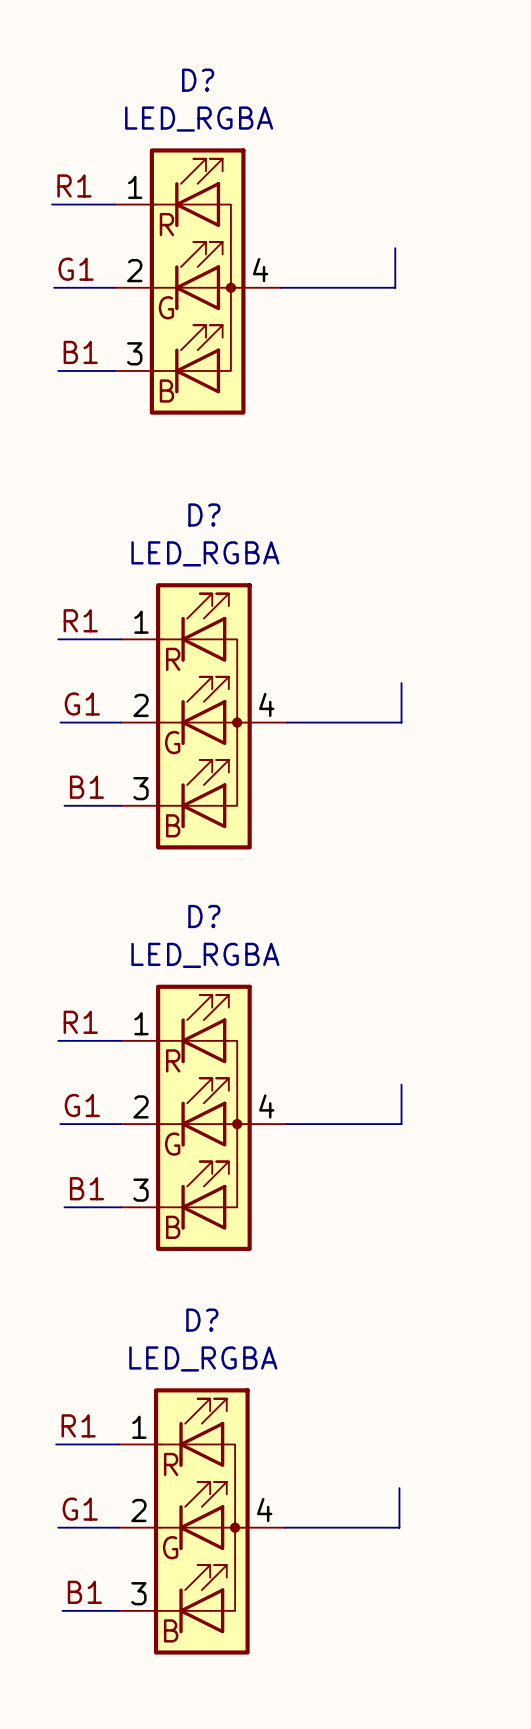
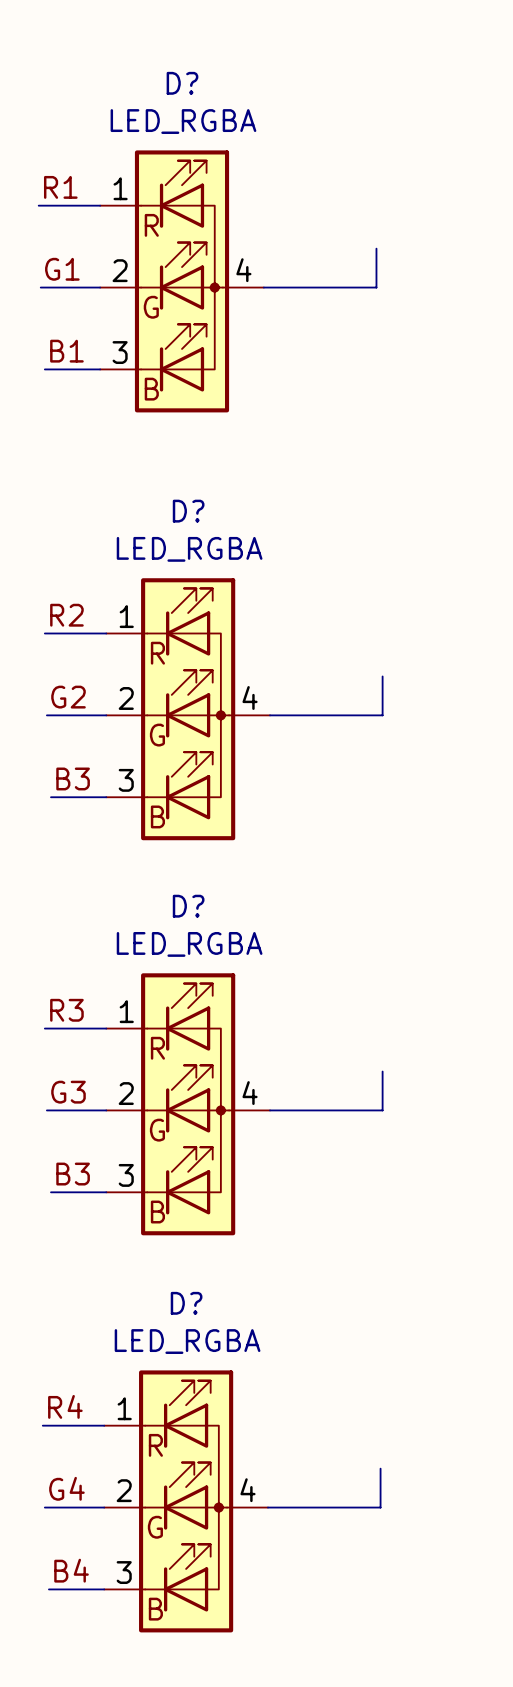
label: R1 (80, 620) -> R2 (66, 615)
label: G1 (82, 704) -> G2 (68, 697)
label: B1 (86, 787) -> B3 (73, 778)
label: R1 (80, 1022) -> R3 (66, 1010)
label: G1 (82, 1105) -> G3 (68, 1092)
label: B1 (86, 1188) -> B3 (73, 1174)
label: R1 (78, 1425) -> R4 (65, 1406)
label: G1 (80, 1509) -> G4 (66, 1488)
label: B1 (84, 1592) -> B4 (71, 1570)

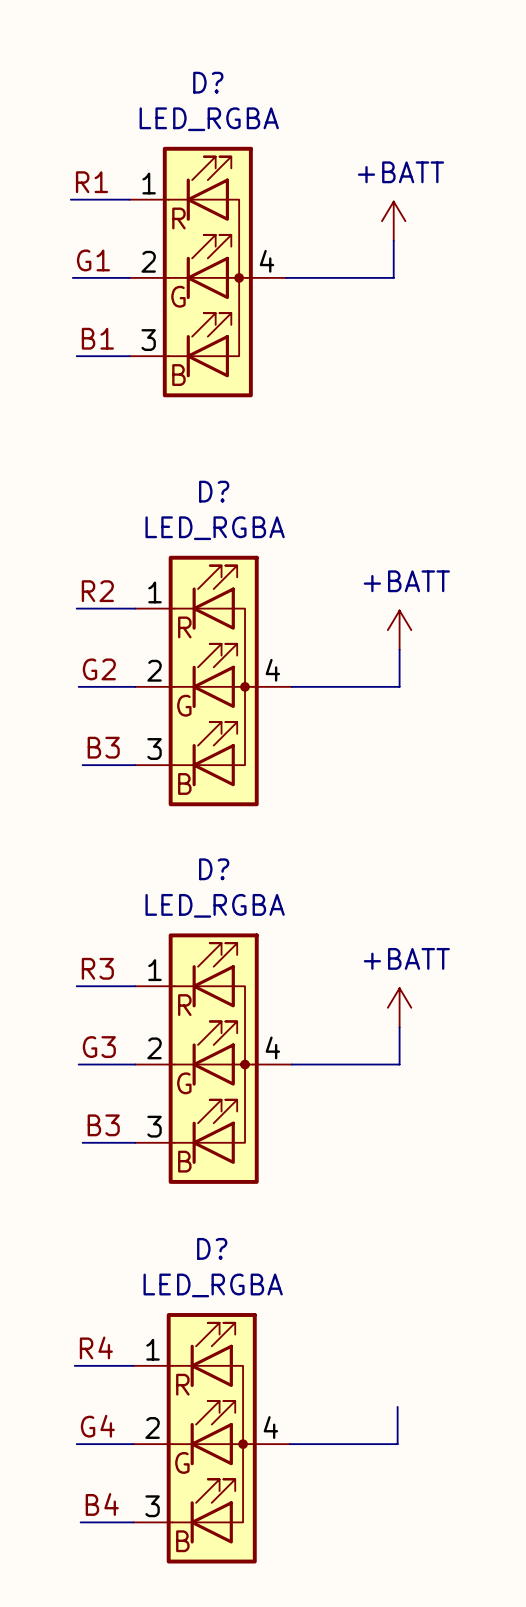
power symbol: none -> +BATT (393, 221)
power symbol: none -> +BATT (399, 630)
power symbol: none -> +BATT (399, 1007)

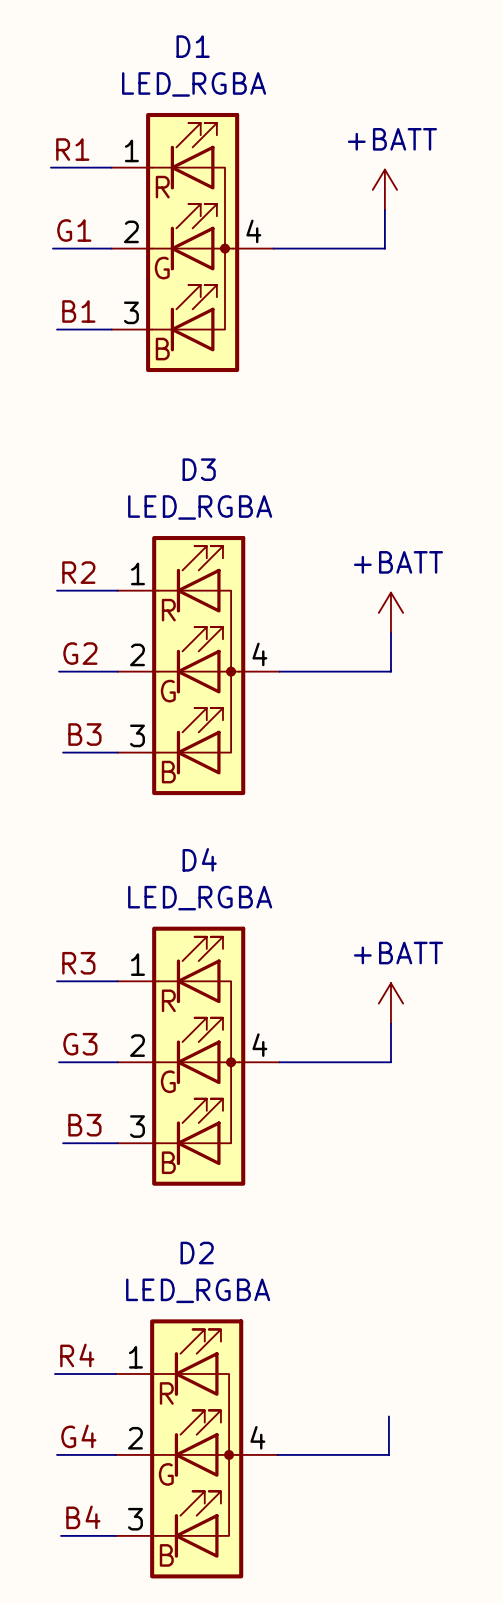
D? name: D? (208, 82) -> D1 (193, 46)
D? name: D? (214, 491) -> D3 (199, 469)
D? name: D? (214, 869) -> D4 (199, 859)
D? name: D? (212, 1248) -> D2 (197, 1253)

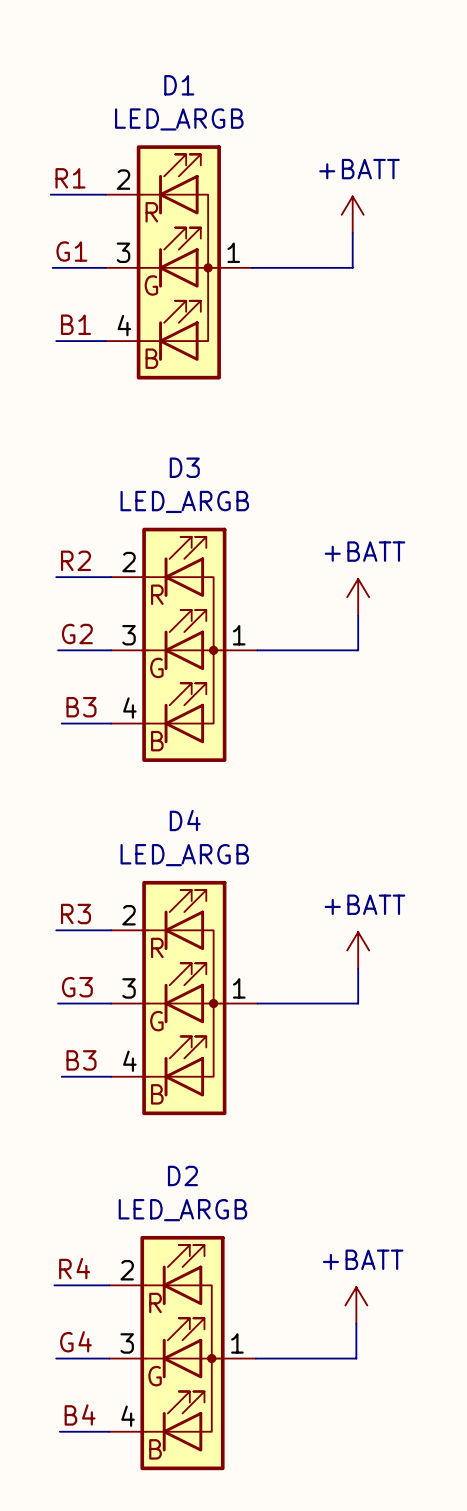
D1 value: LED_RGBA (194, 84) -> LED_ARGB (179, 119)
D1 symbol: [111, 112, 274, 373] -> [105, 145, 253, 380]
D3 value: LED_RGBA (200, 507) -> LED_ARGB (184, 501)
D3 symbol: [117, 536, 280, 796] -> [111, 527, 258, 762]
D4 value: LED_RGBA (200, 898) -> LED_ARGB (184, 855)
D4 symbol: [117, 926, 280, 1186] -> [111, 880, 258, 1116]
D2 value: LED_RGBA (198, 1290) -> LED_ARGB (182, 1210)
D2 symbol: [115, 1319, 278, 1579] -> [109, 1235, 256, 1471]
power symbol: none -> +BATT (356, 1305)

